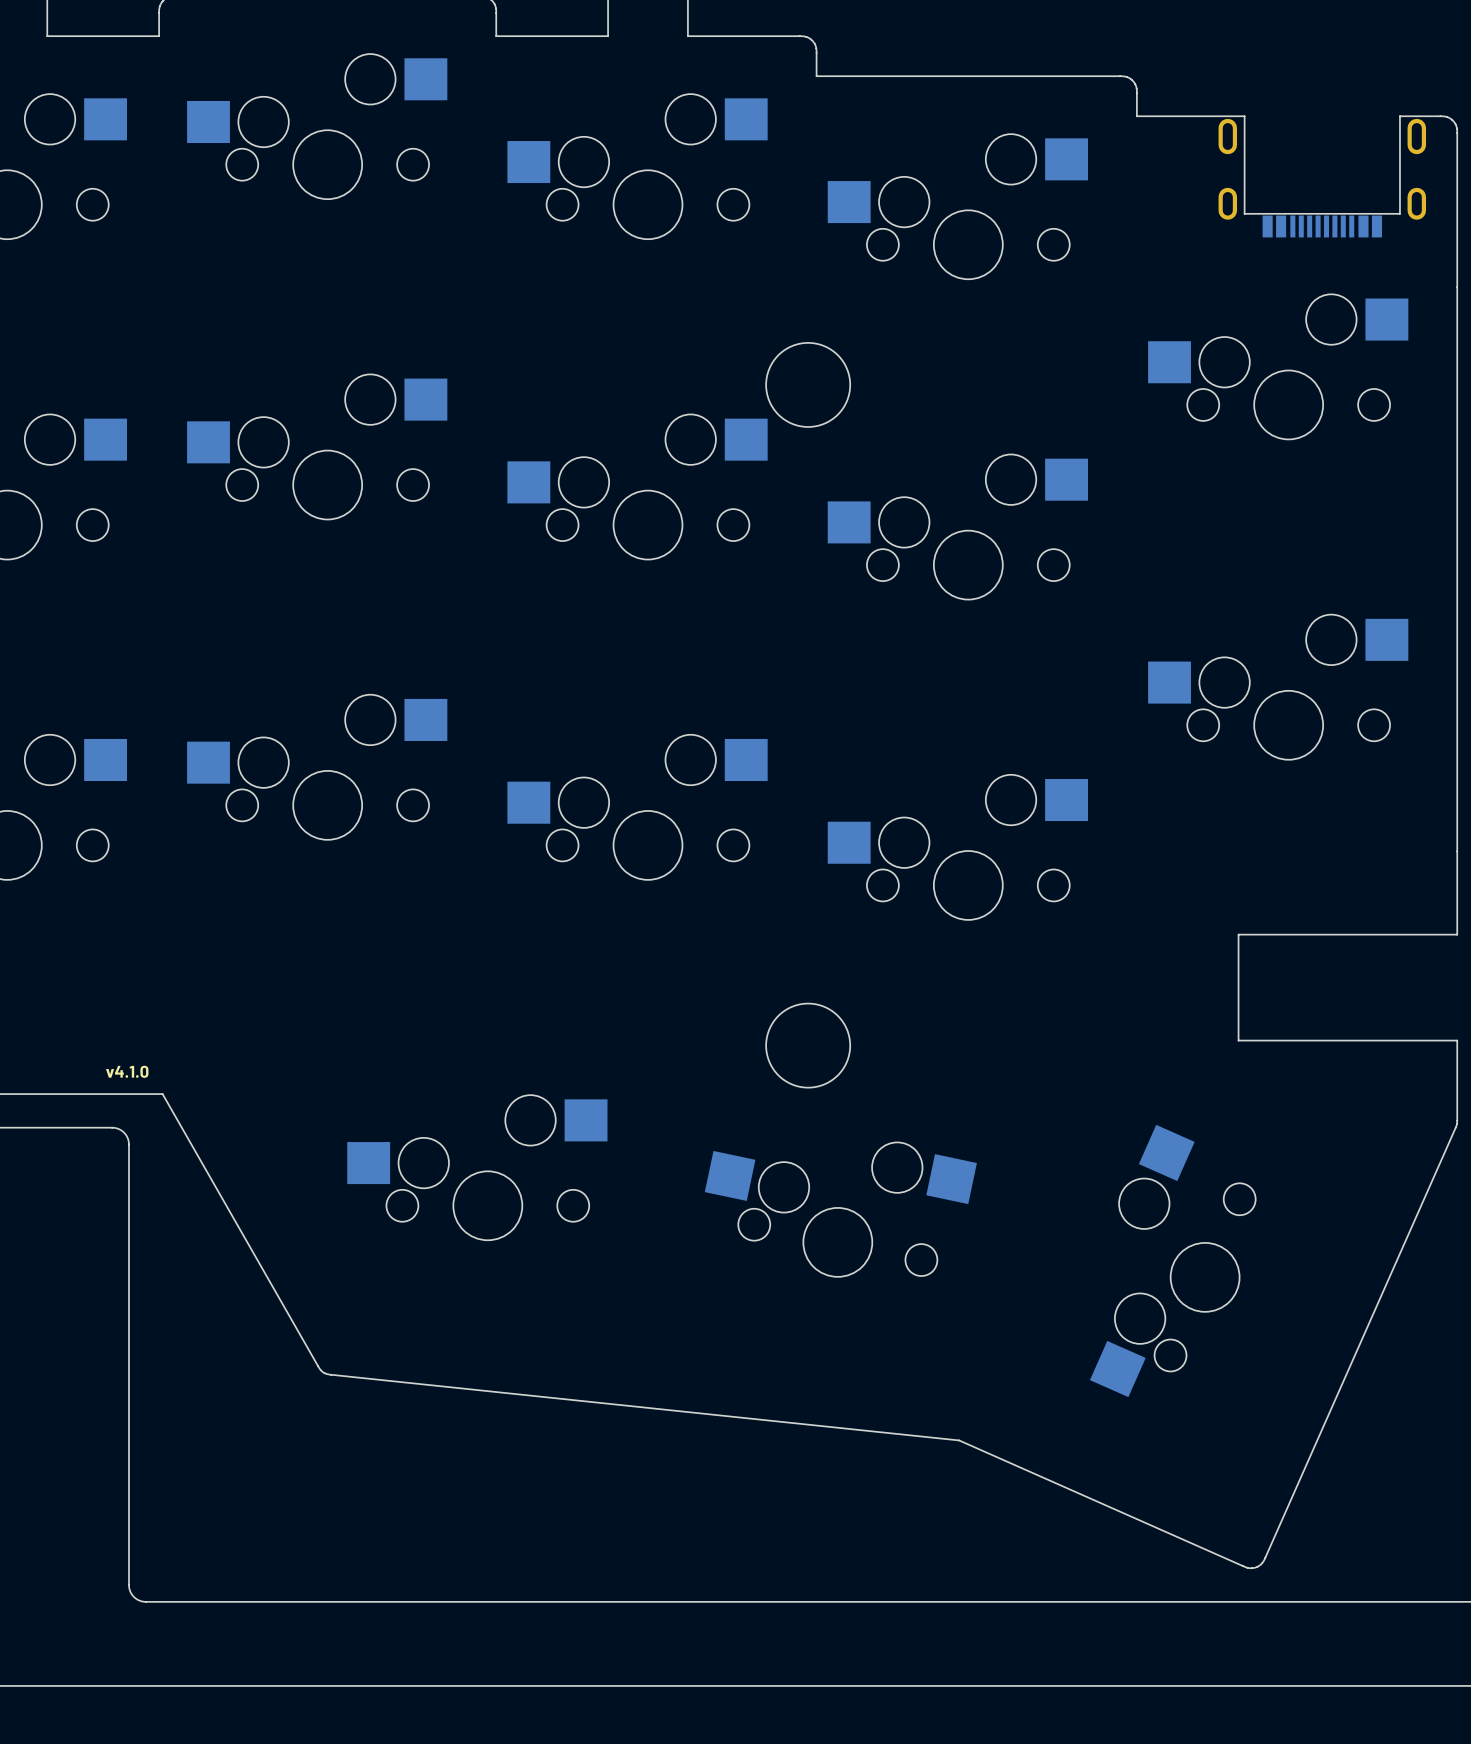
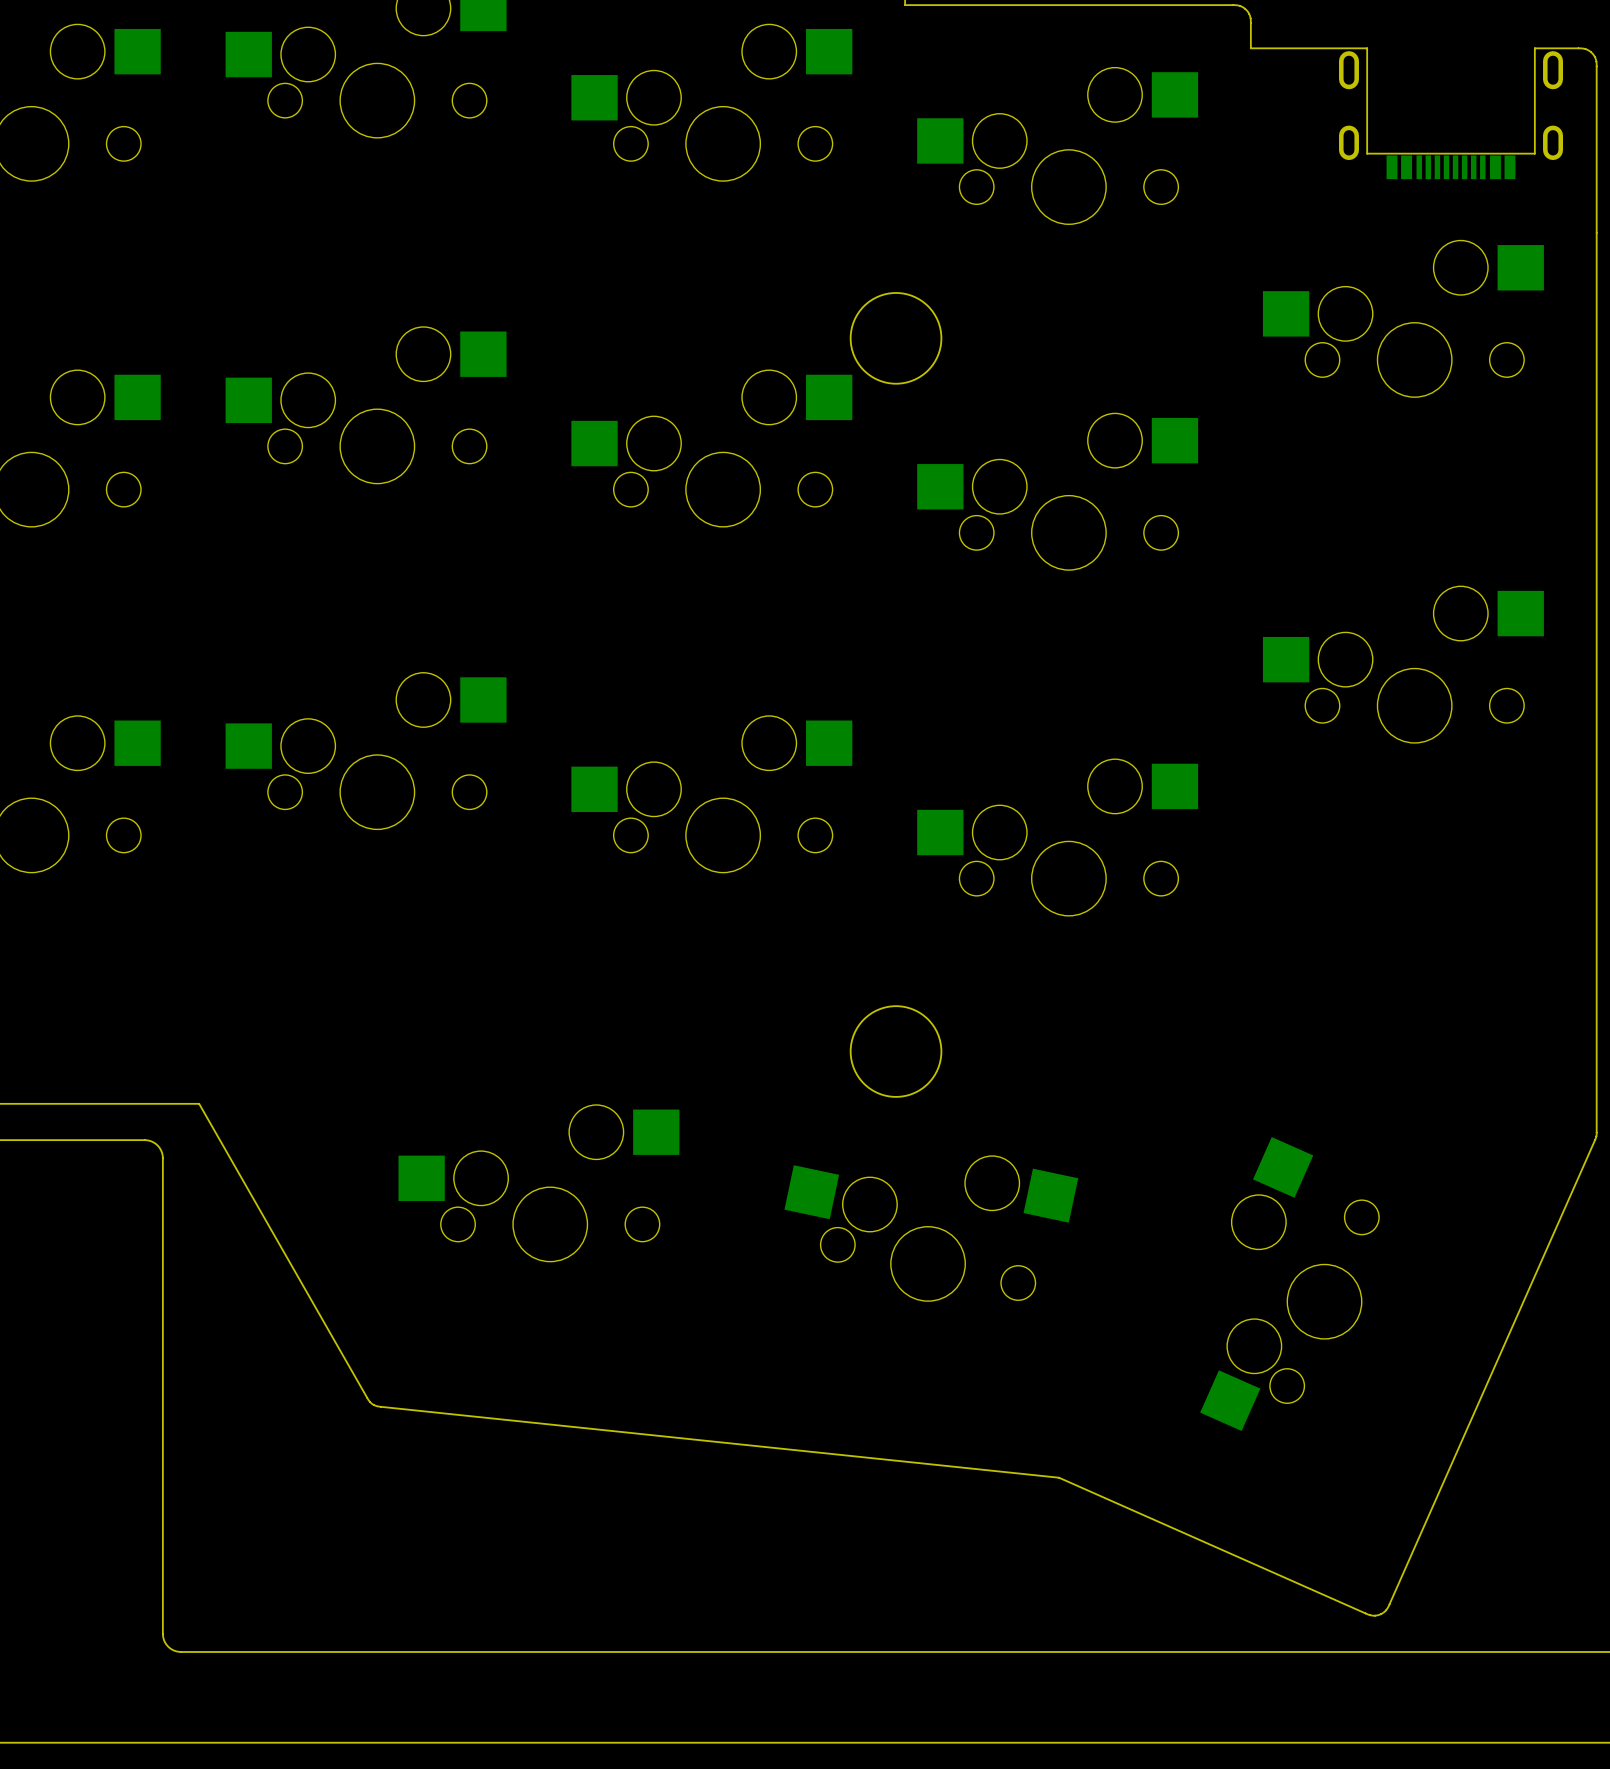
board edge: (1457, 934) (1238, 934) (1238, 1040) (1457, 1040) -> (1596, 931) (1596, 1046)
text: v4.1.0 (127, 1071) -> none

